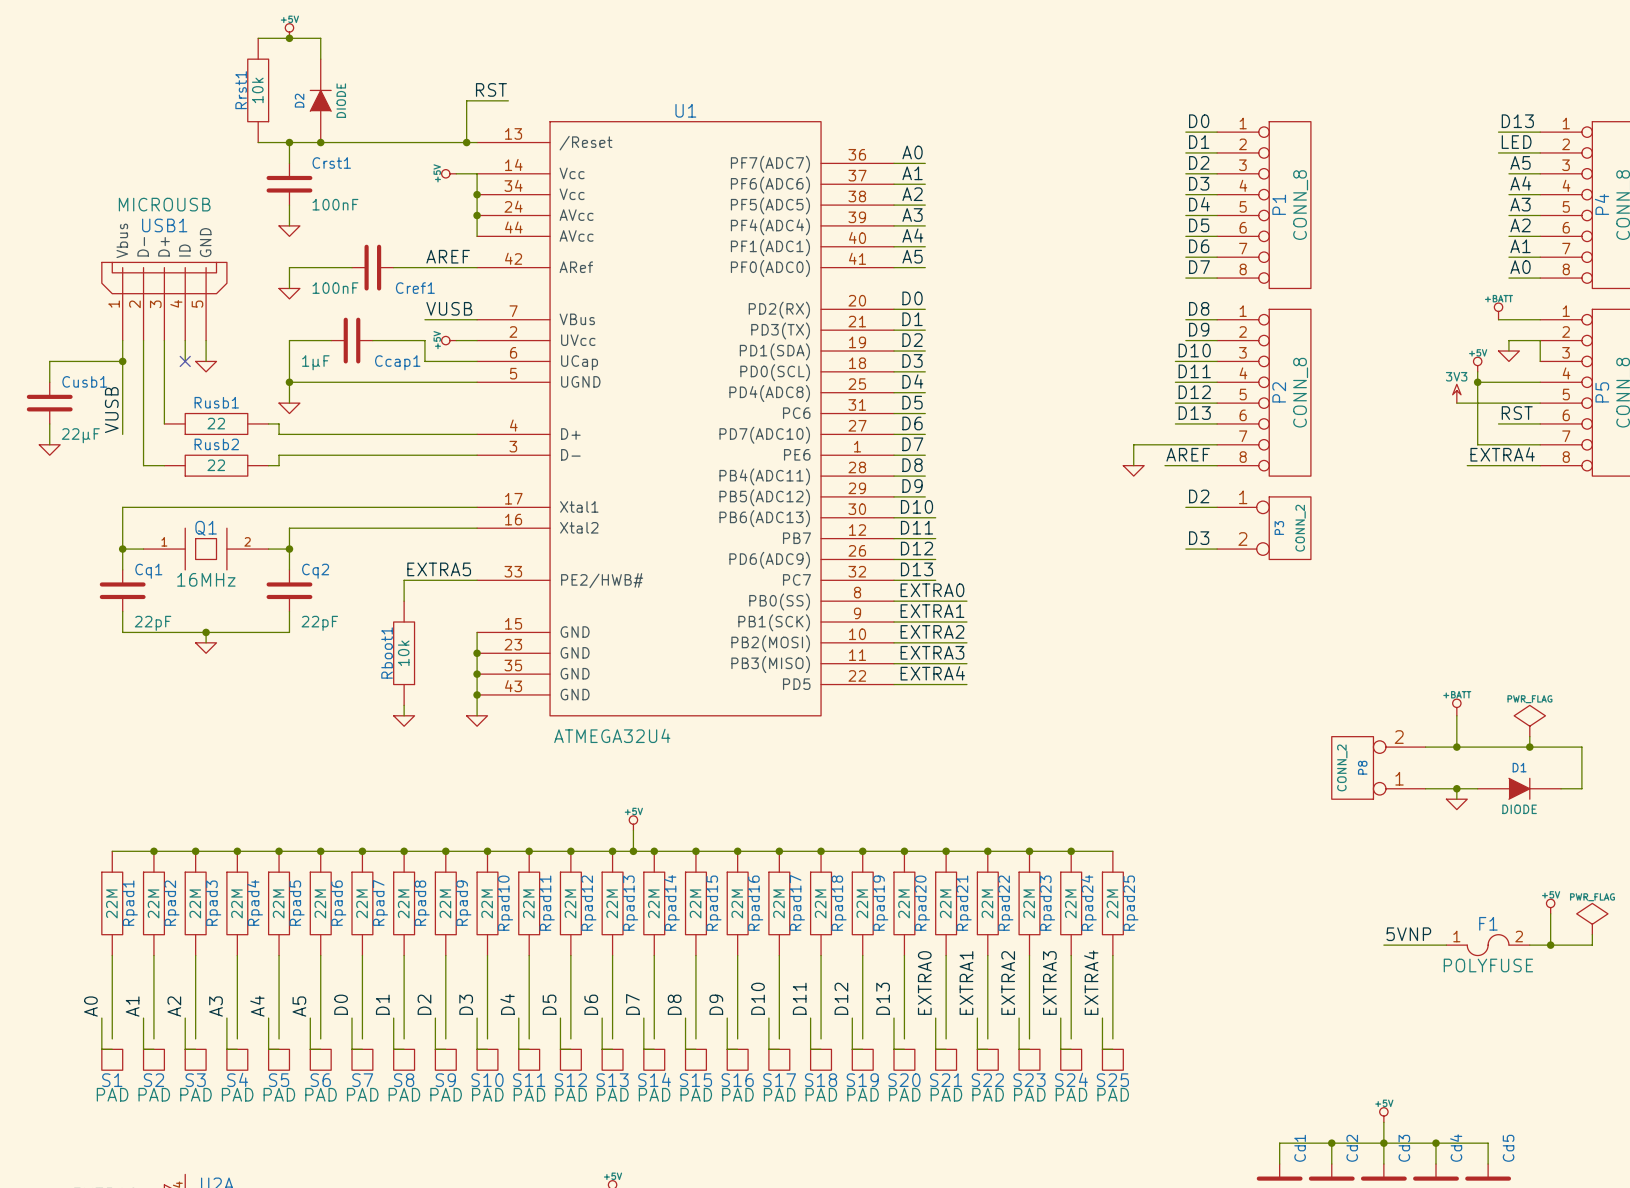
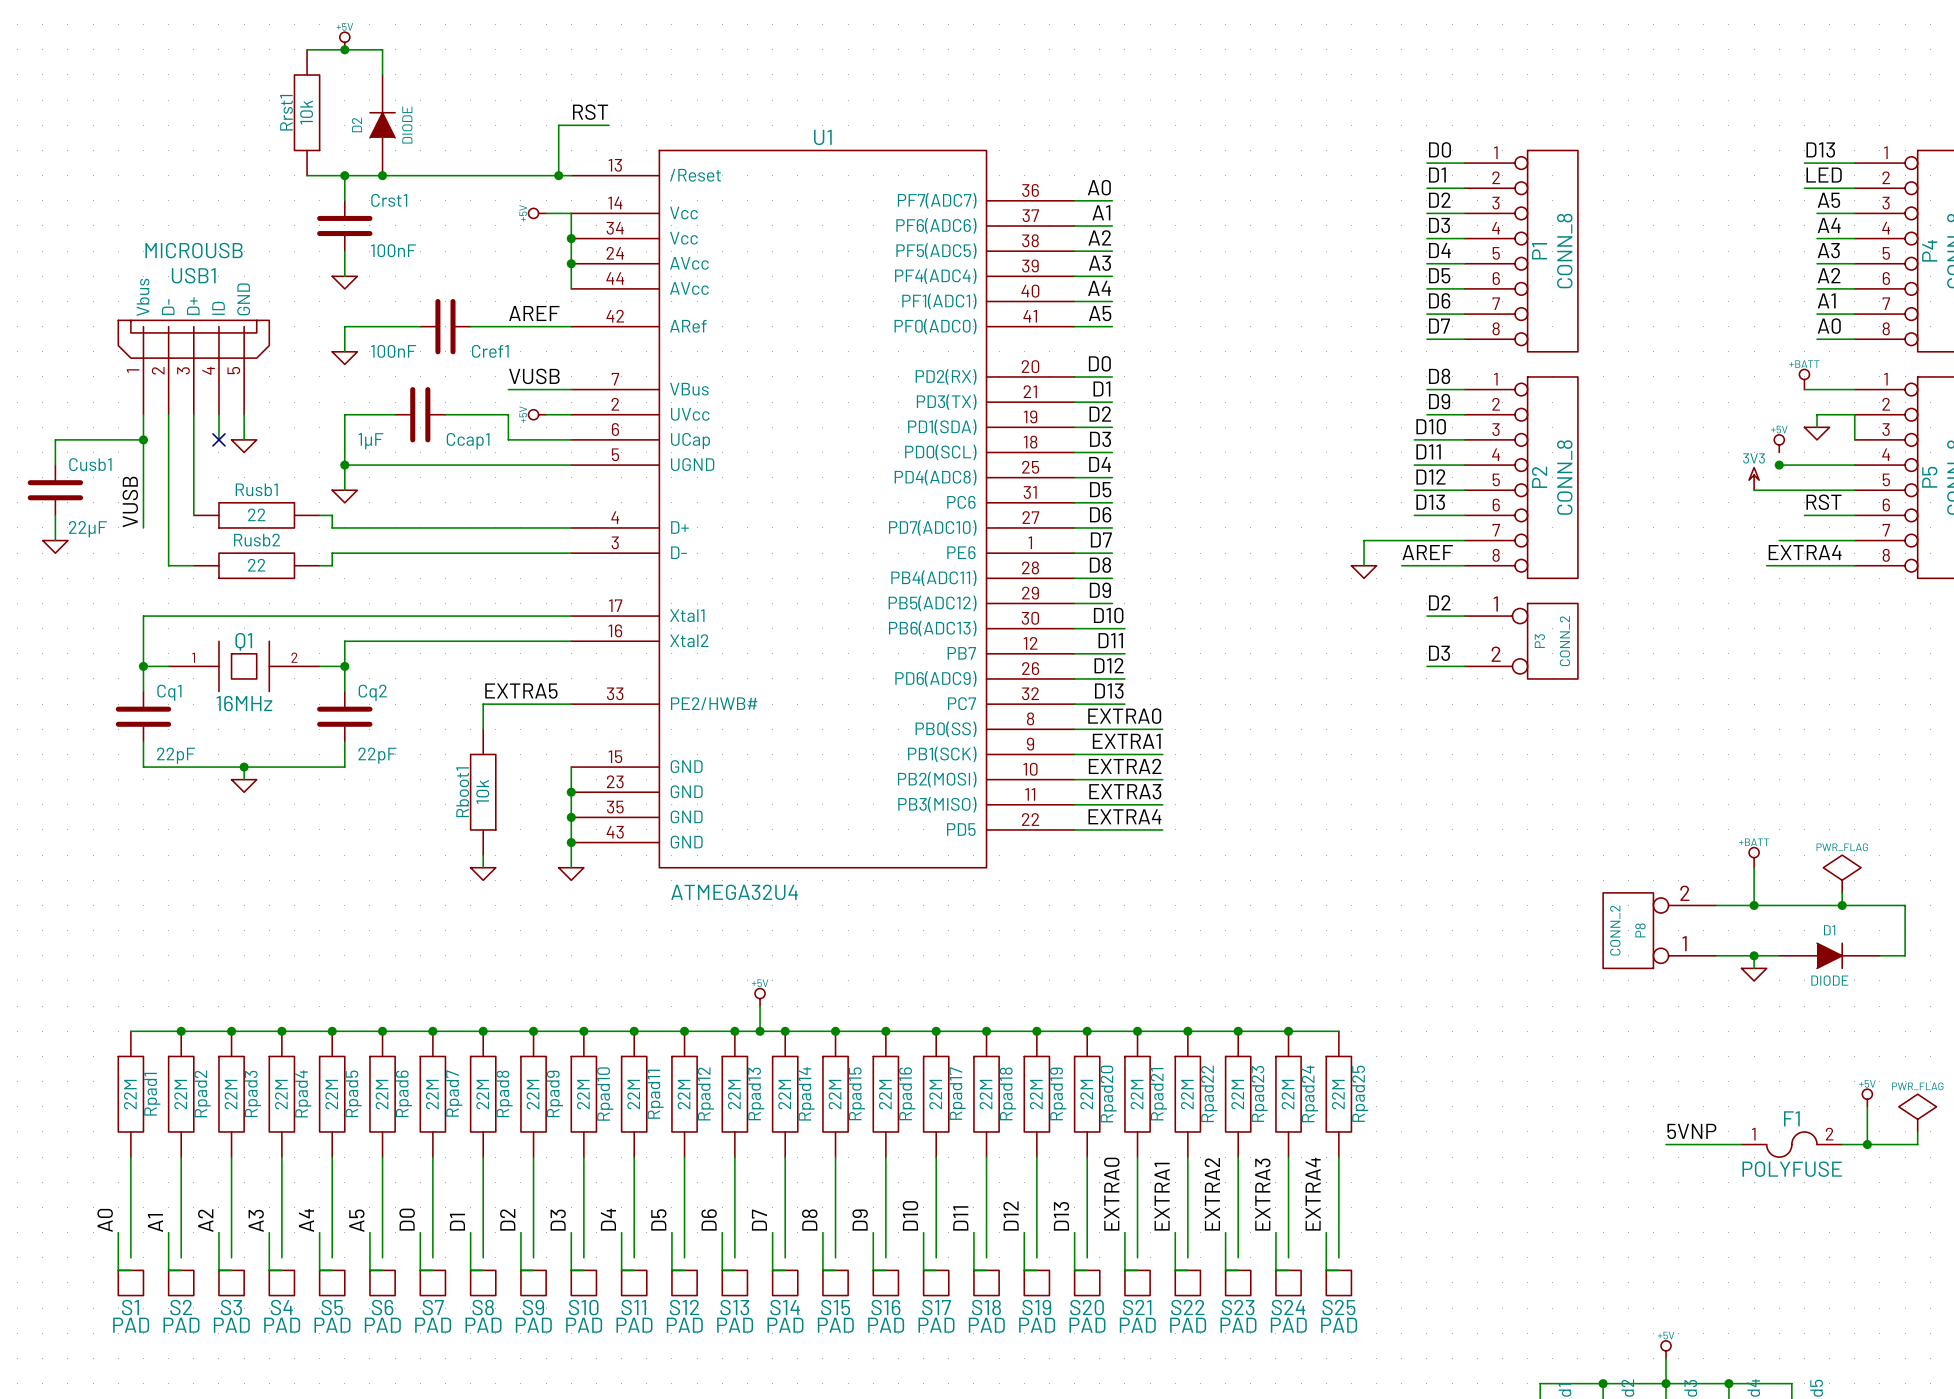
wire: (1477, 371) (1477, 444) -> none

